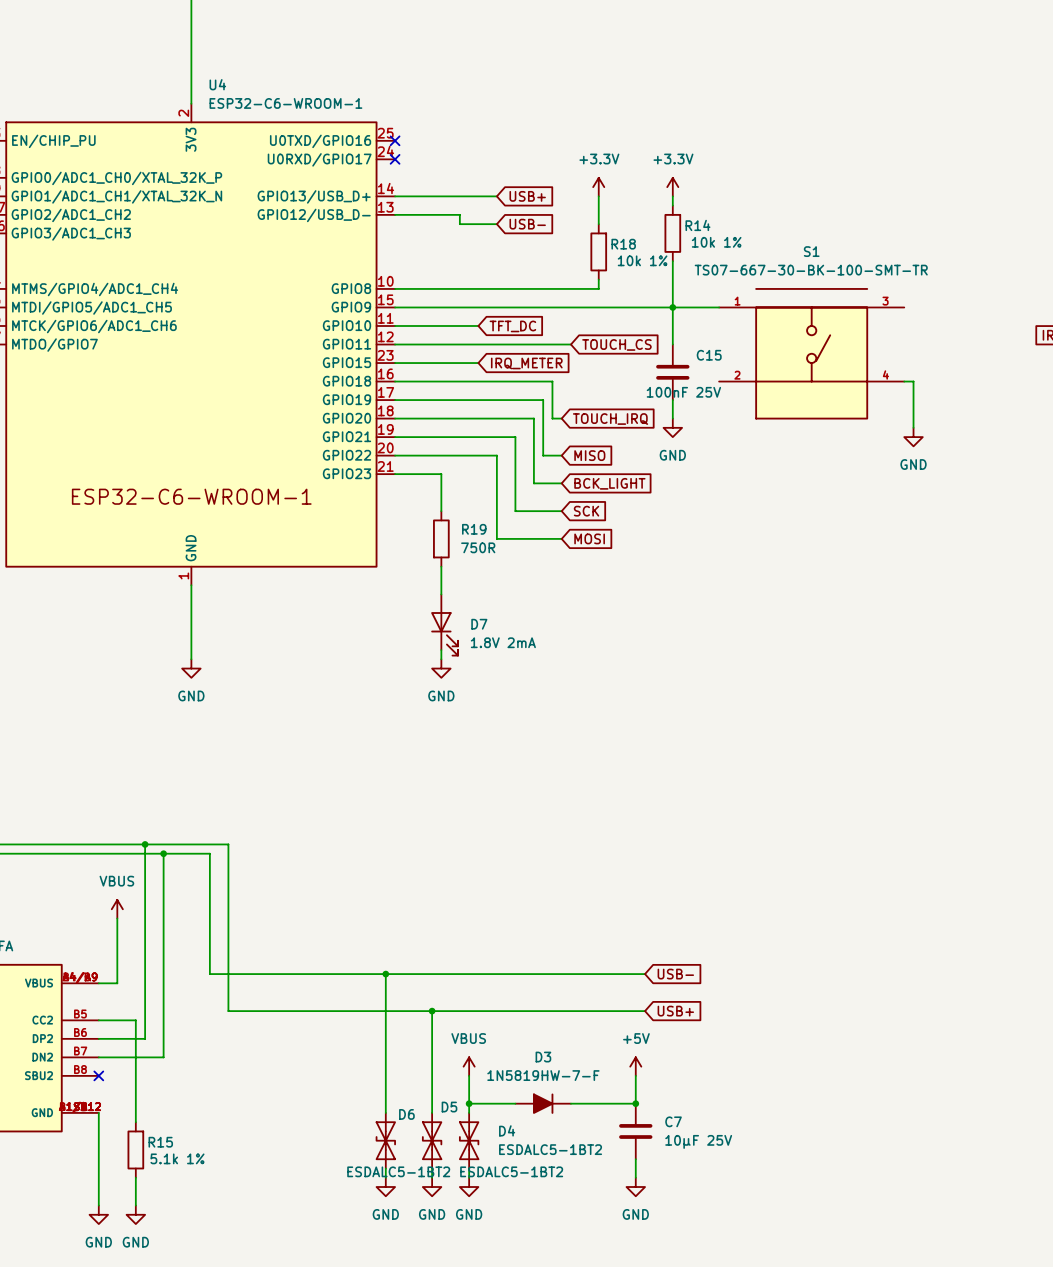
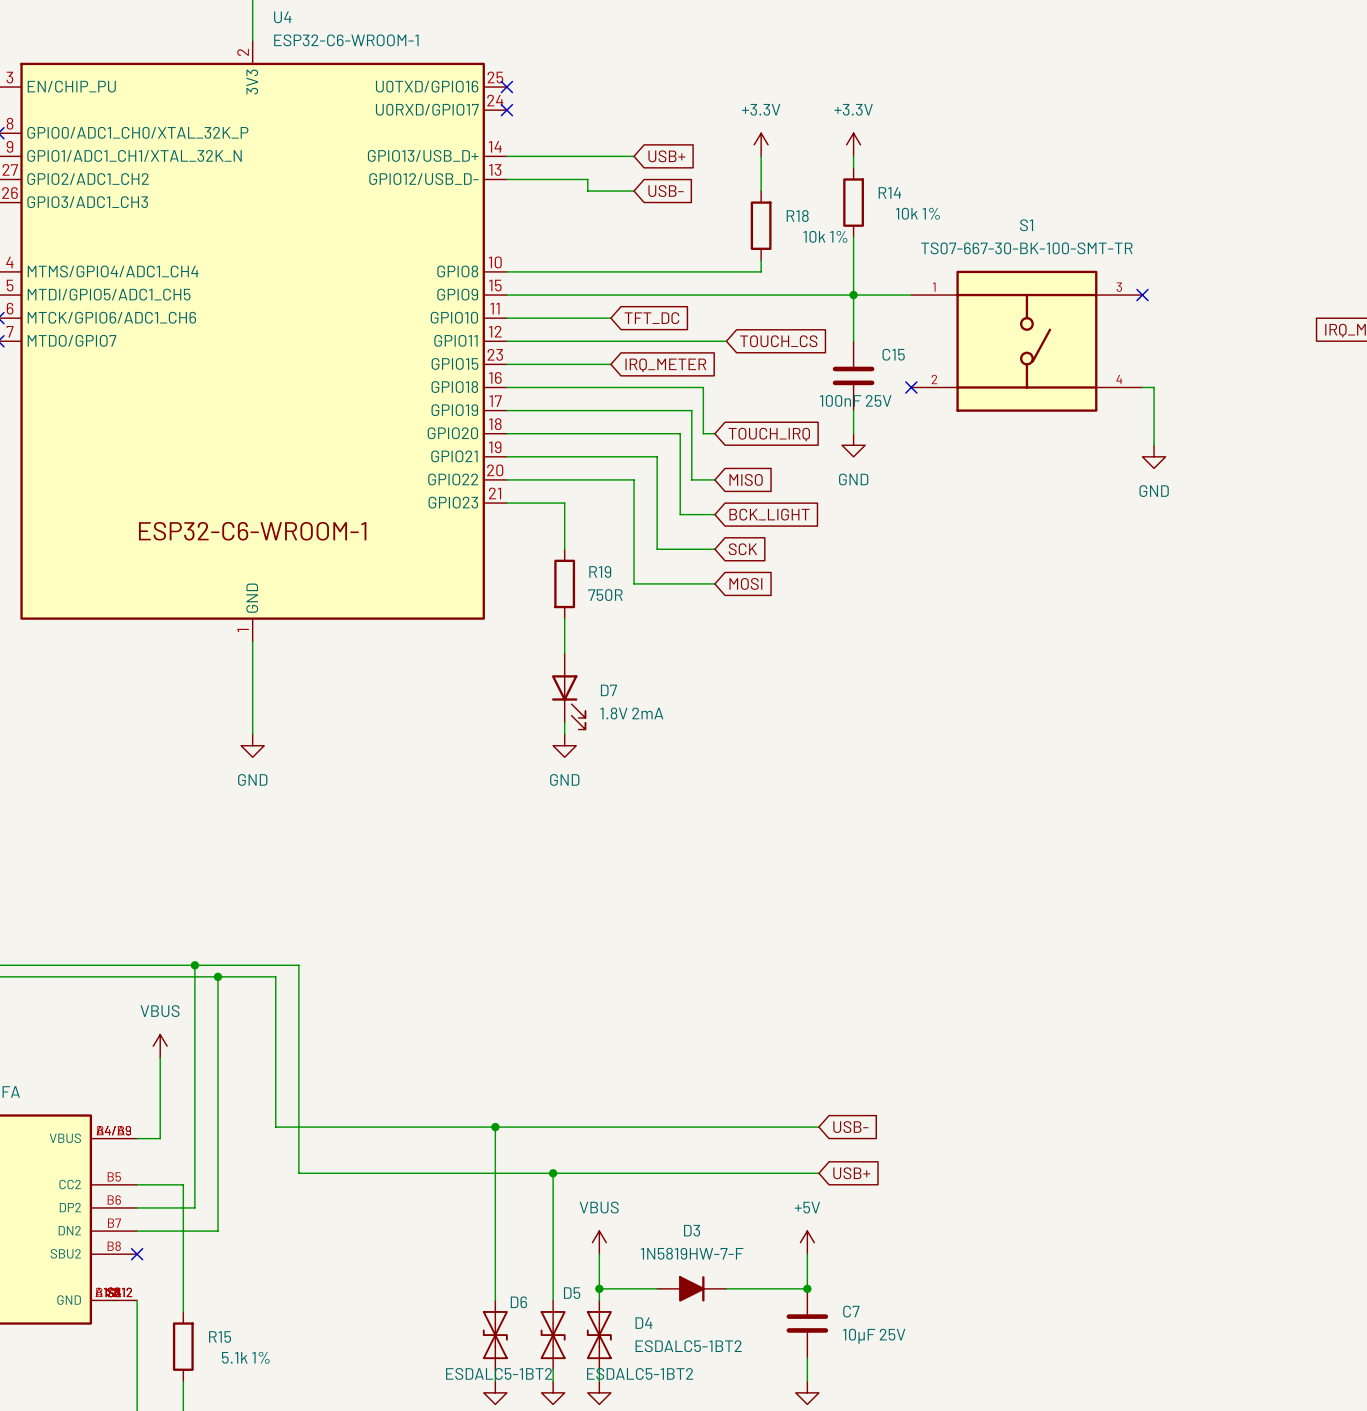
S1 symbol: [719, 288, 905, 420] -> [911, 270, 1143, 412]
no-connect mark: none -> (1142, 295)
no-connect mark: none -> (911, 387)

